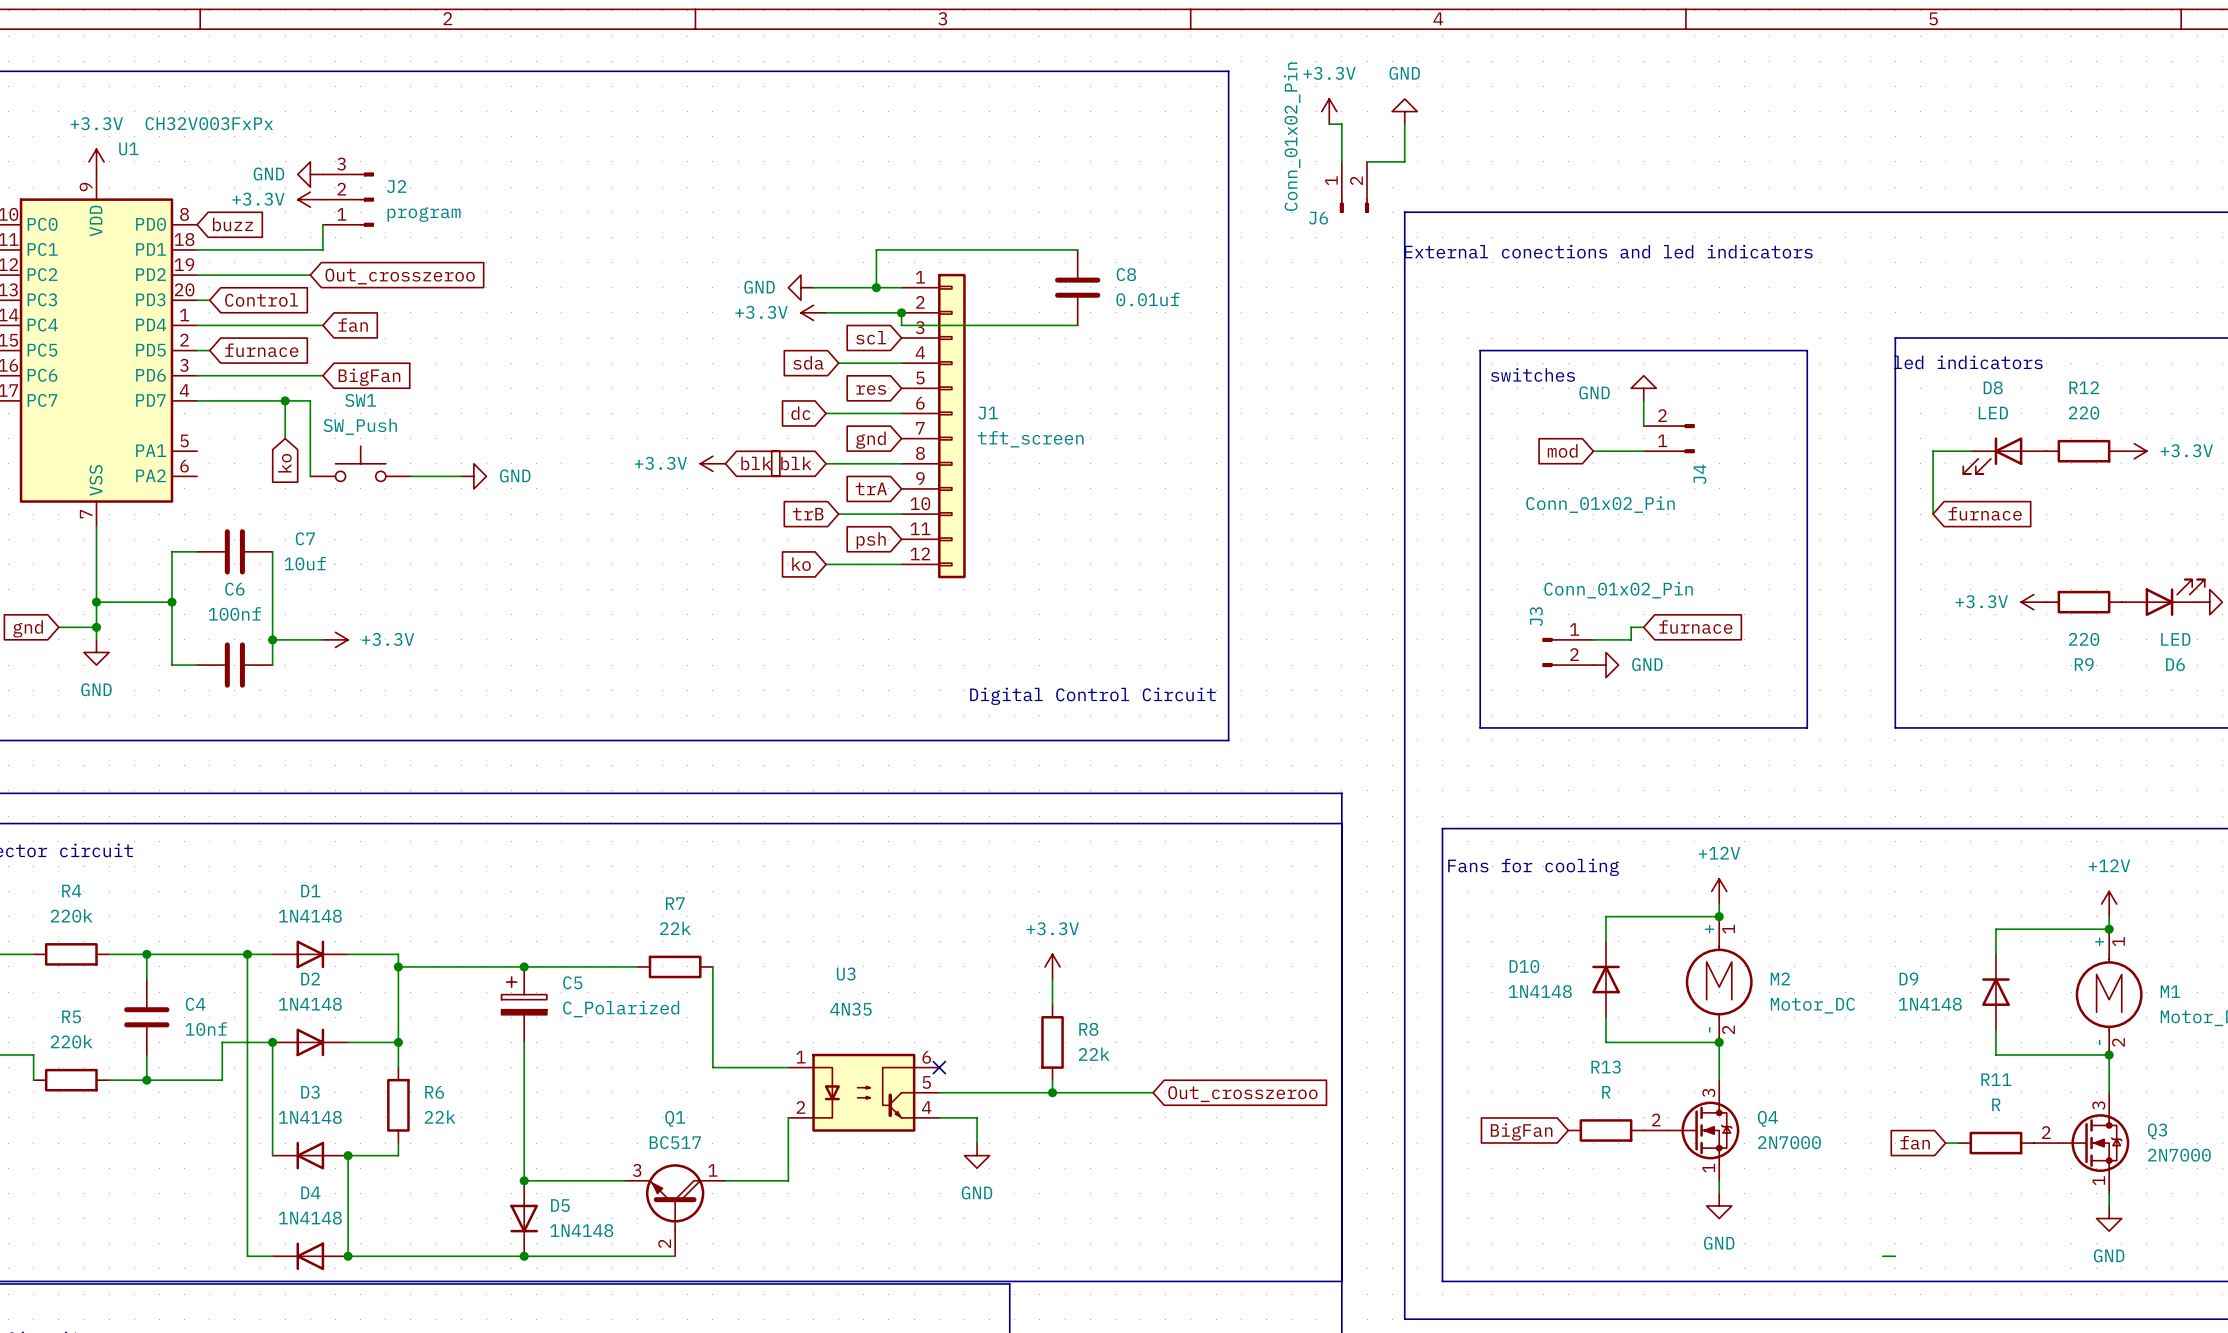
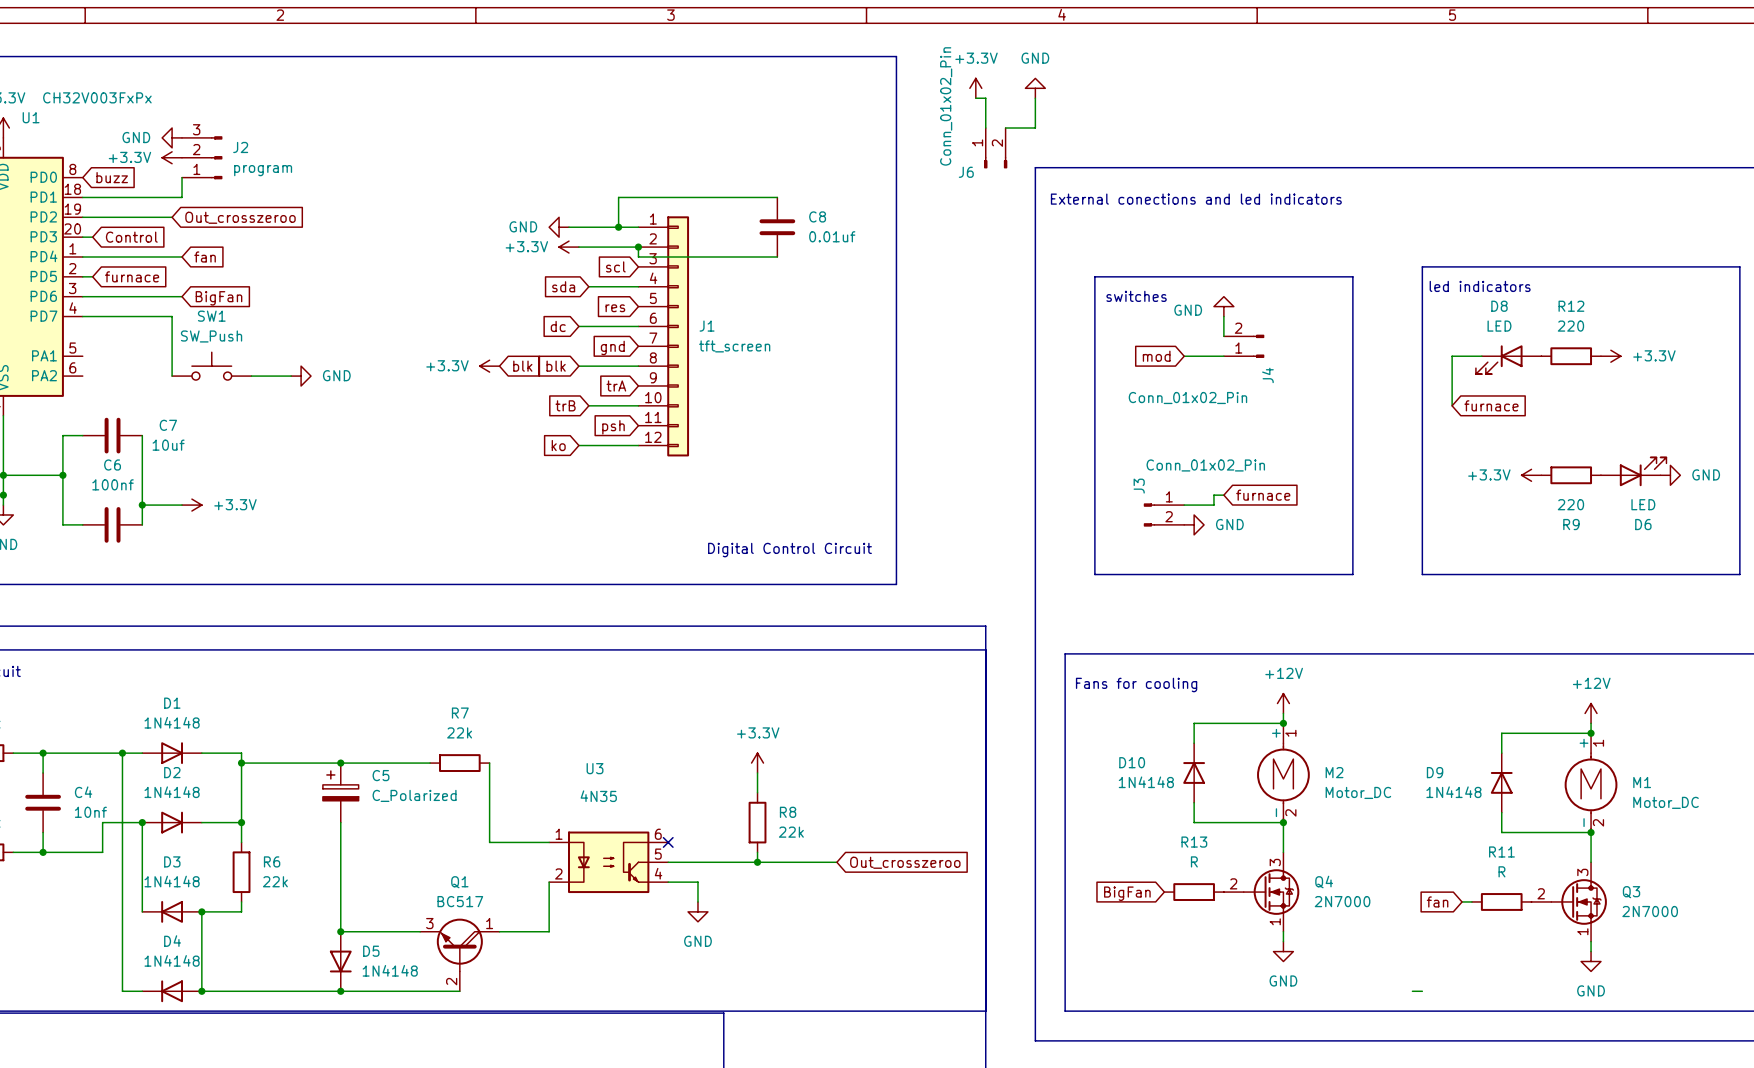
wire: (285, 400) (285, 438) -> none
junction: (285, 400) -> none
global label: ko (284, 463) -> none

